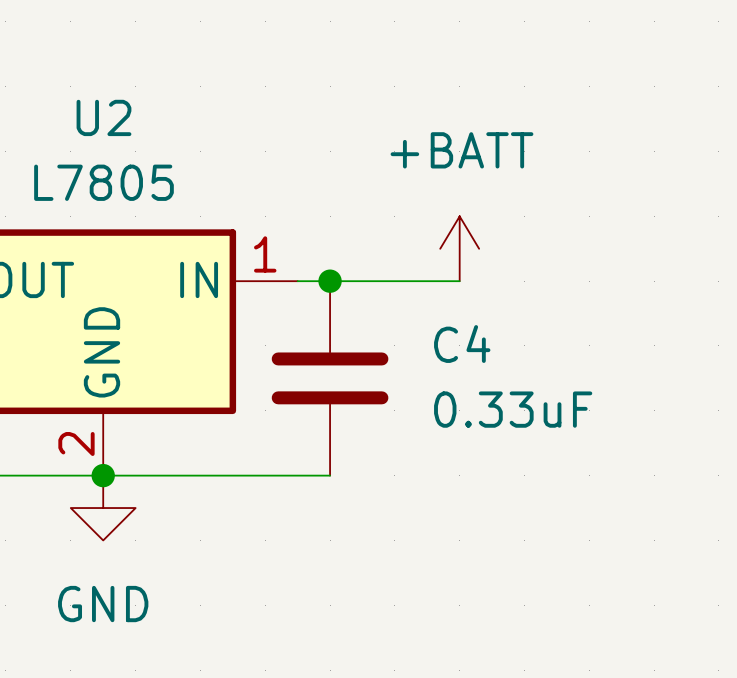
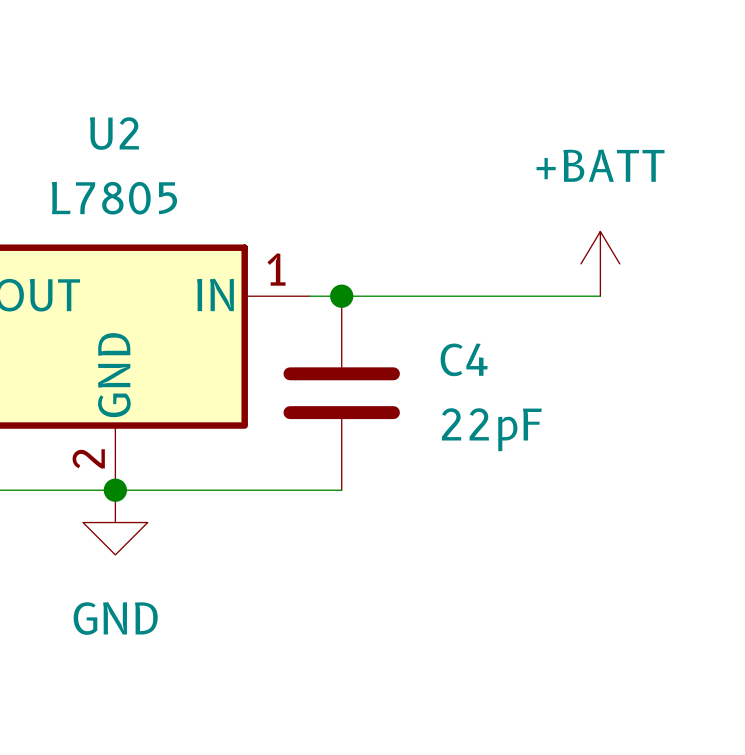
power symbol position: +BATT (459, 248) -> +BATT (600, 263)
wire: none -> (471, 296) (600, 296)
C4 value: 0.33uF (513, 409) -> 22pF (491, 429)

